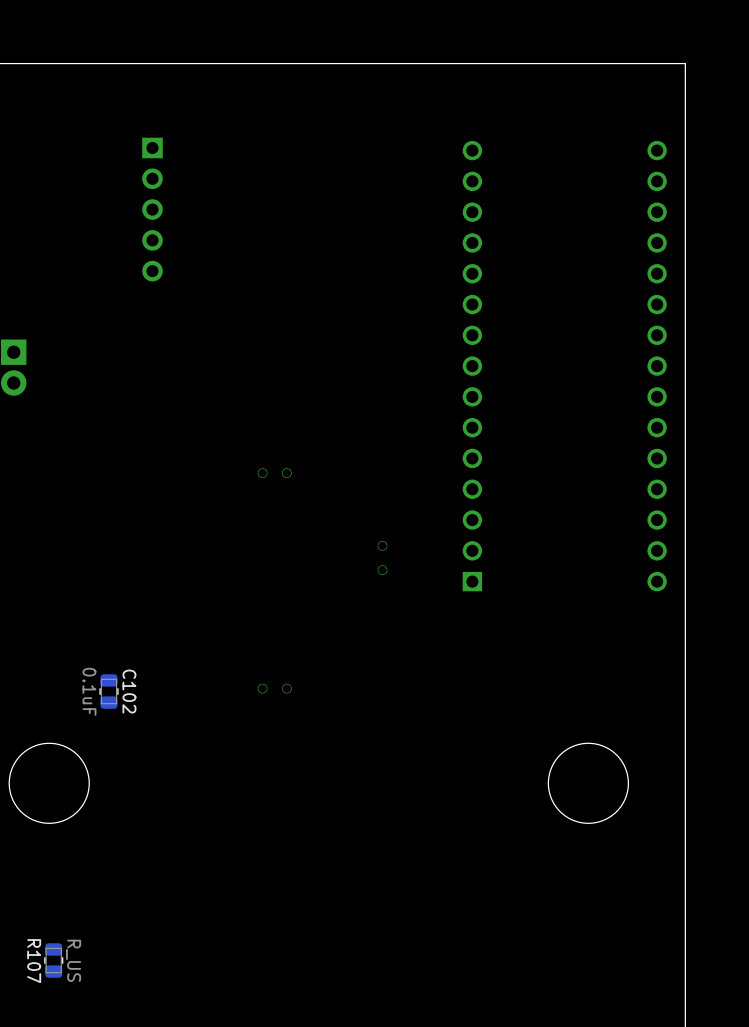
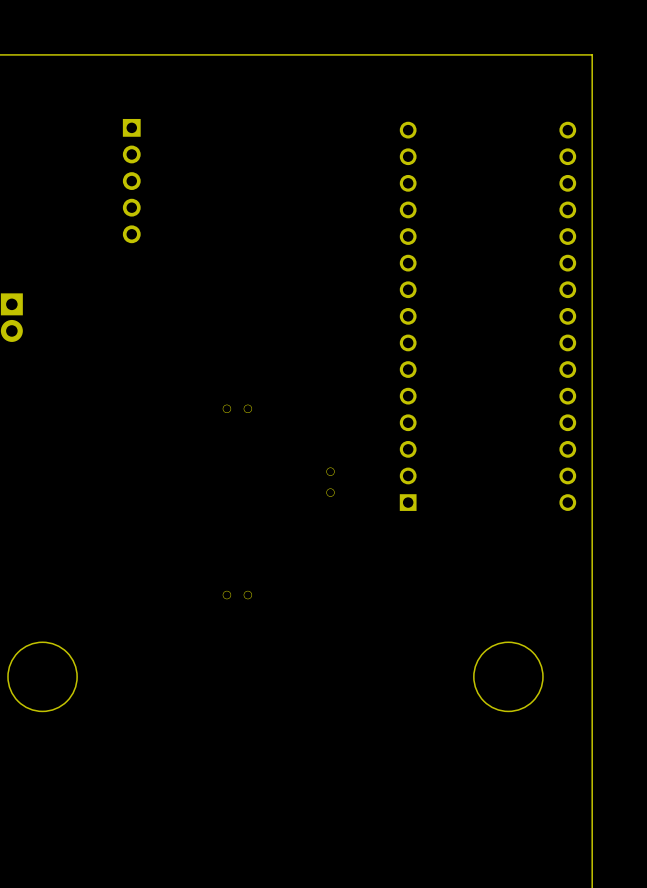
C102: 0.1uF (108, 691) -> none
R107: R_US (53, 960) -> none

